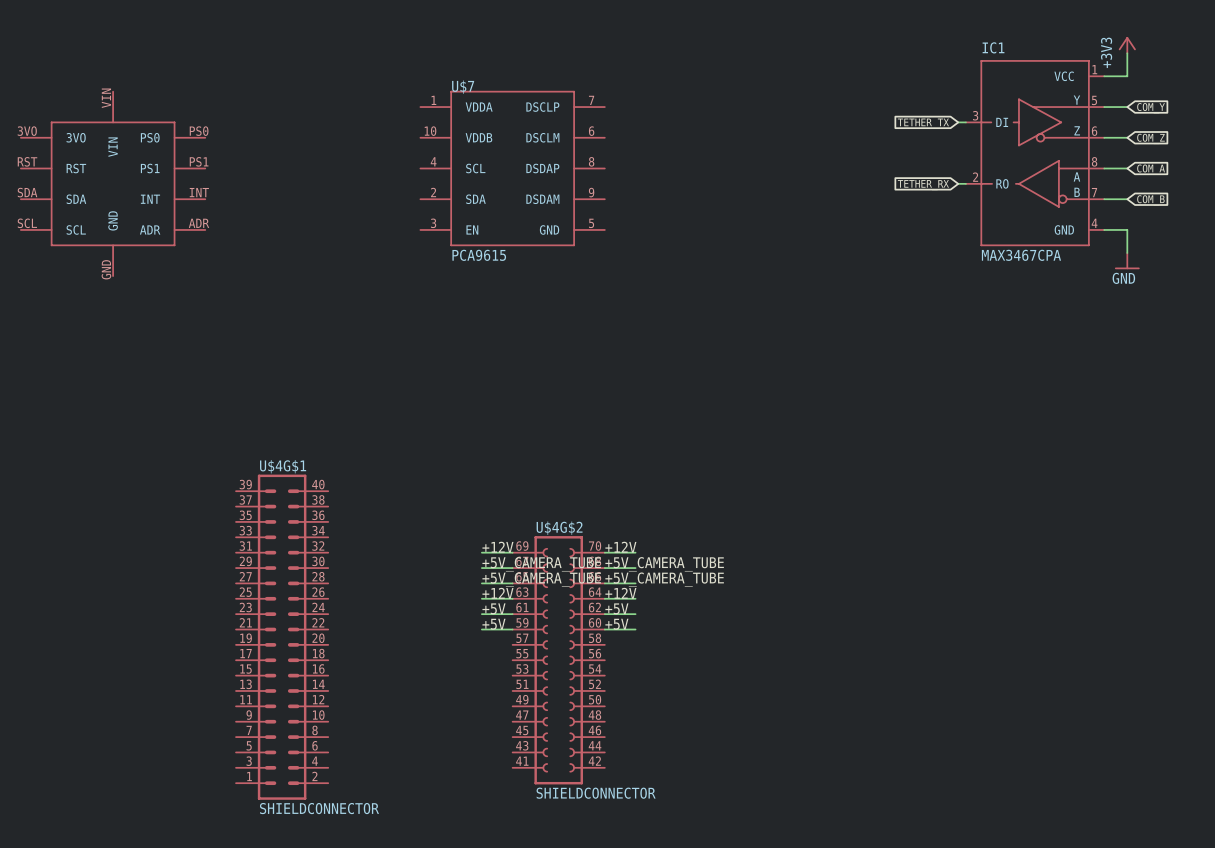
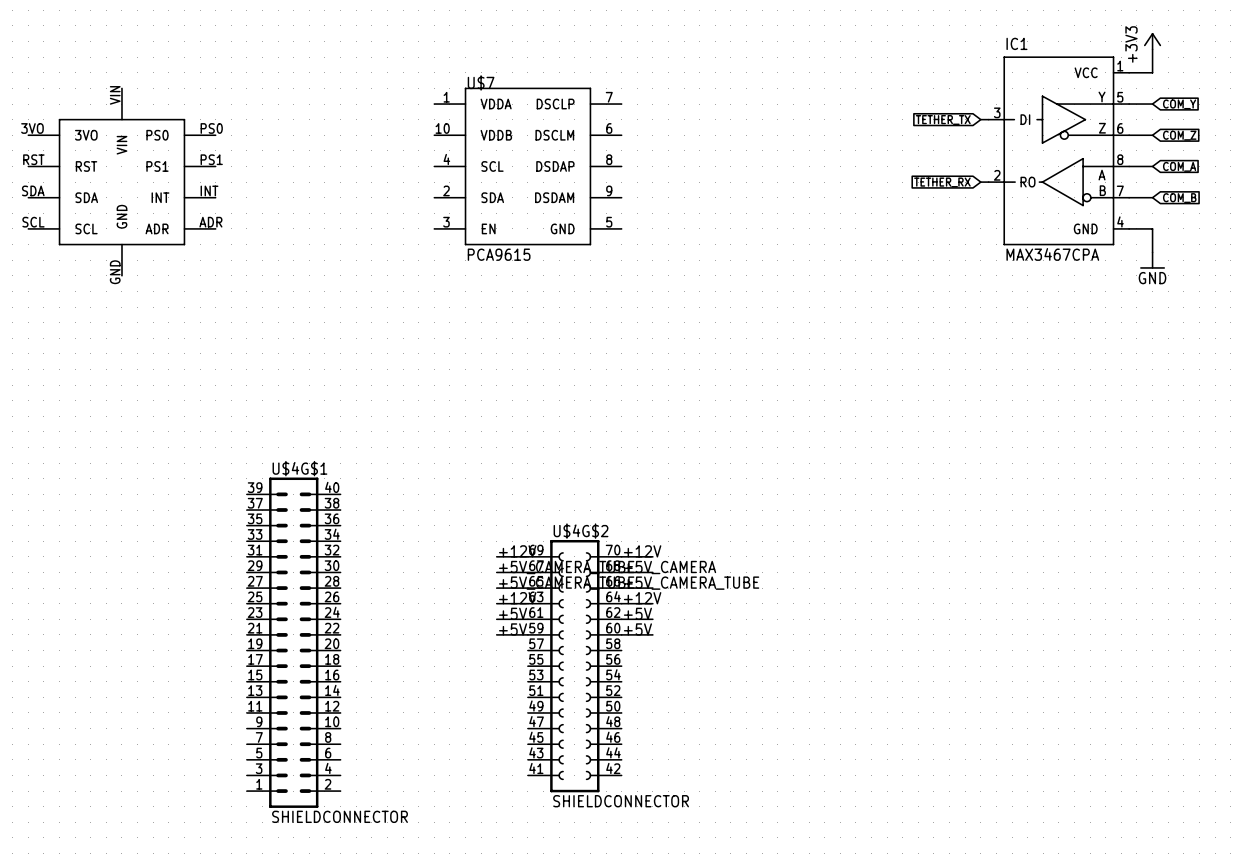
label: +5V_CAMERA_TUBE (664, 564) -> +5V_CAMERA (670, 567)

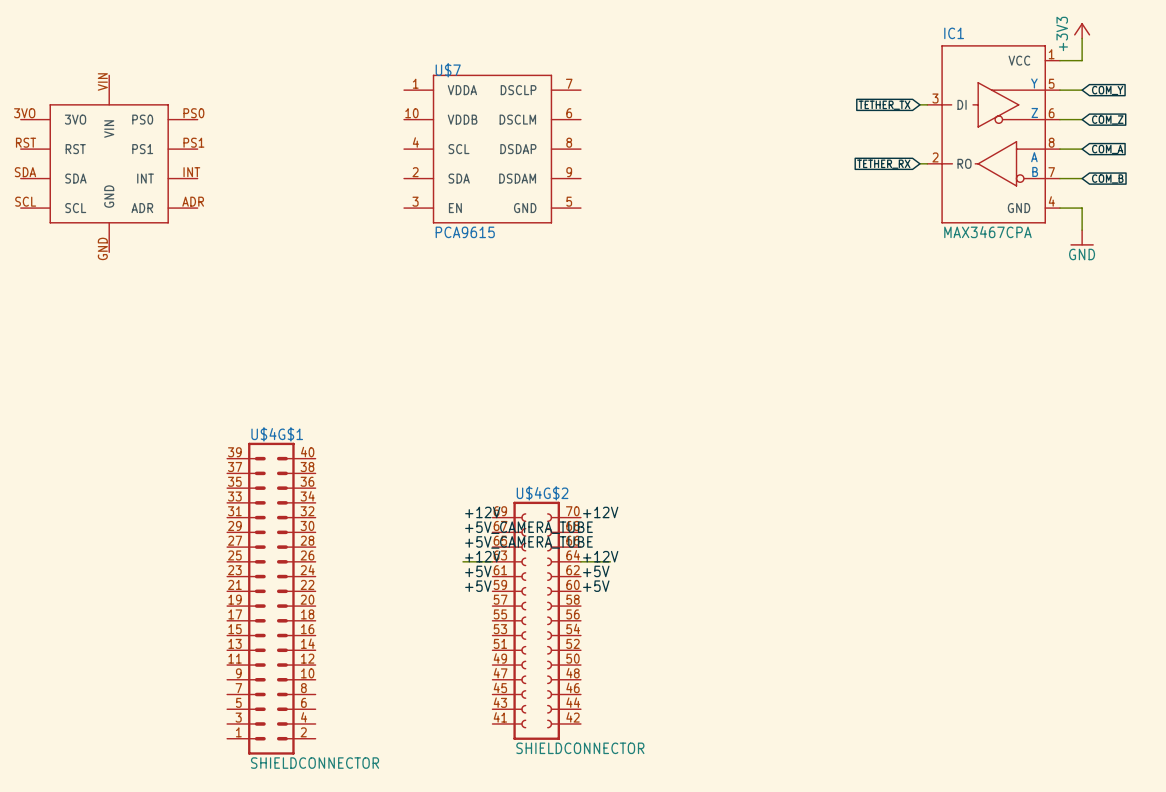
wire: (496, 556) (527, 556) -> none
wire: (621, 556) (652, 556) -> none
label: +5V_CAMERA (670, 567) -> none
wire: (496, 572) (527, 572) -> none
wire: (621, 572) (652, 572) -> none
label: +5V_CAMERA_TUBE (691, 583) -> none
wire: (496, 588) (527, 588) -> none
wire: (621, 588) (652, 588) -> none
wire: (496, 619) (527, 619) -> none
wire: (621, 619) (652, 619) -> none
wire: (496, 634) (527, 634) -> none
wire: (621, 634) (652, 634) -> none

